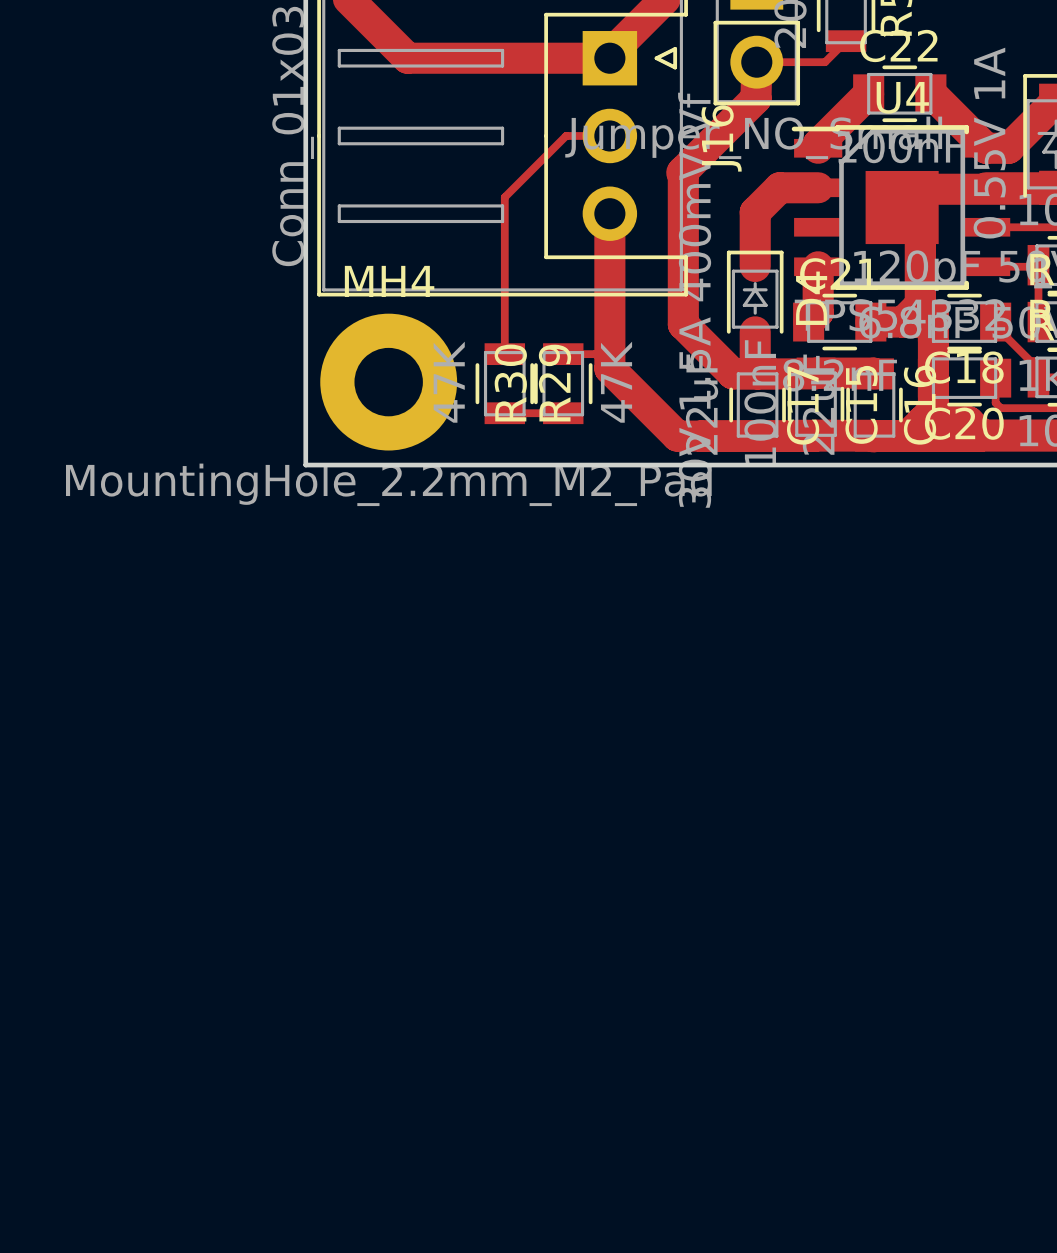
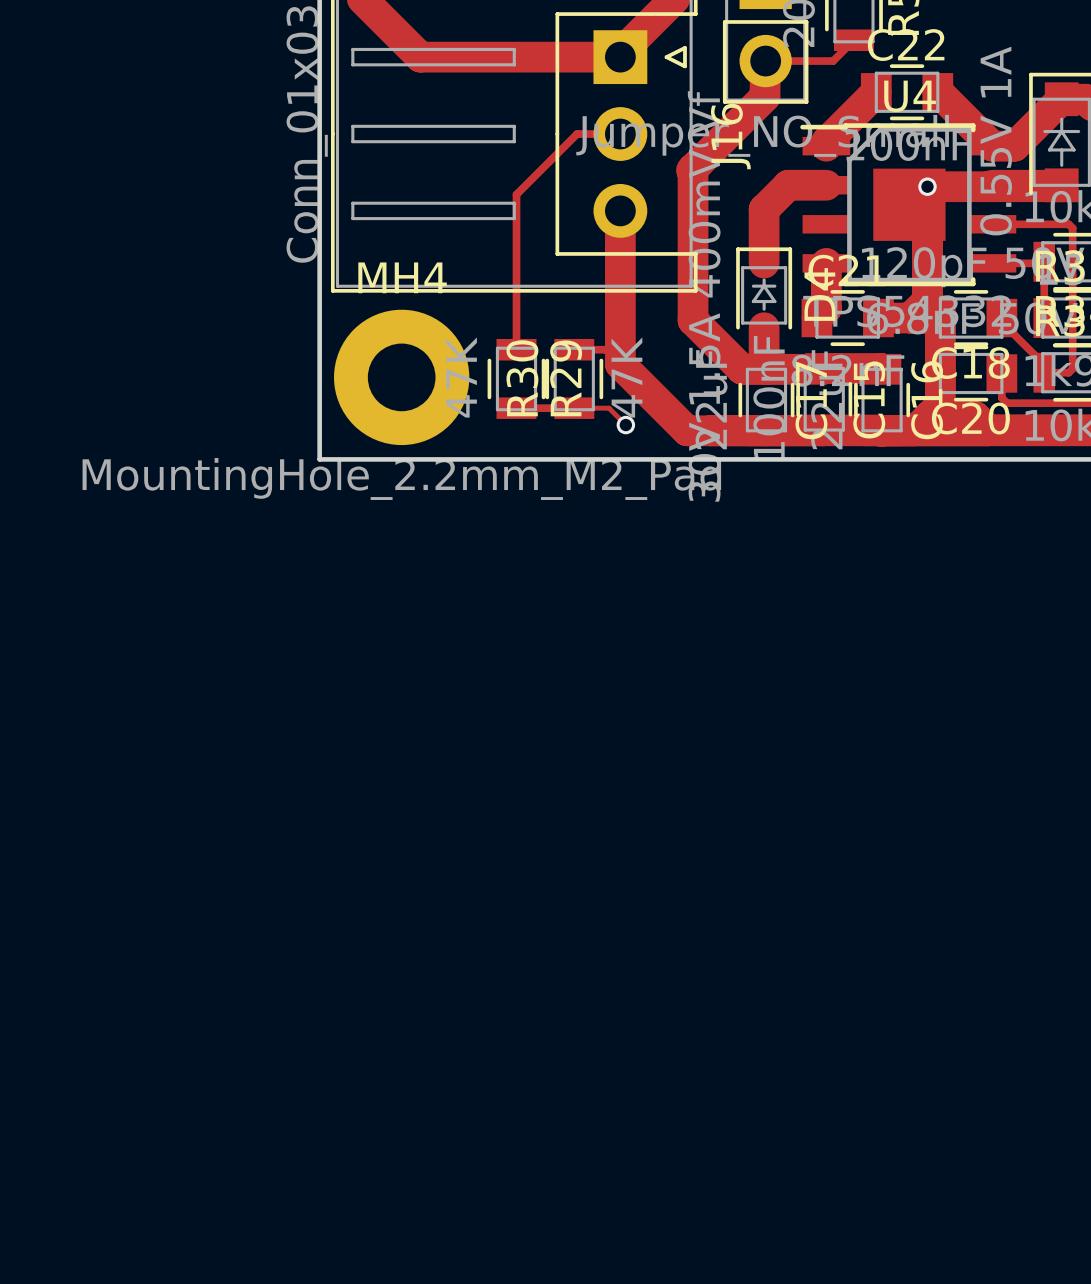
via: none -> (927, 186)
track: none -> (574, 408) (608, 408) (625, 425)
via: none -> (625, 425)

